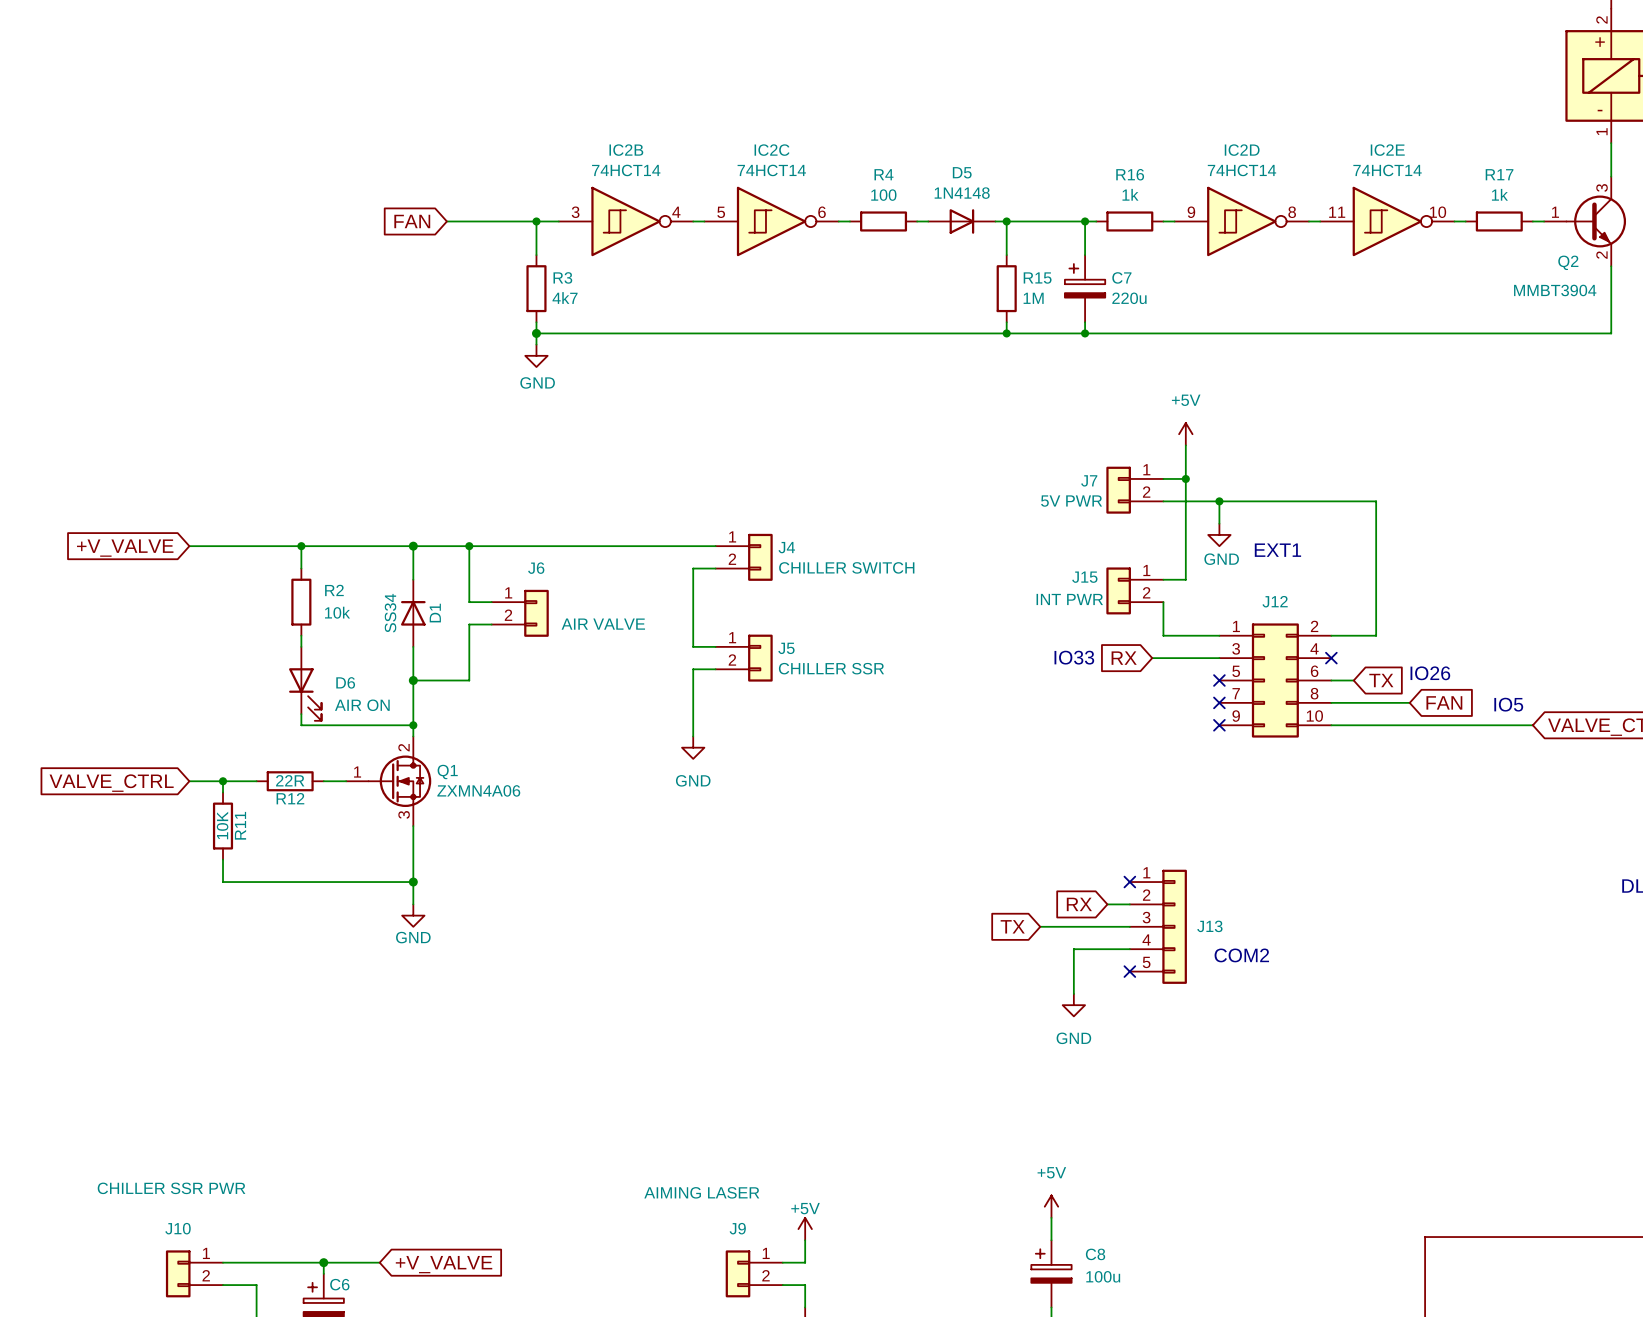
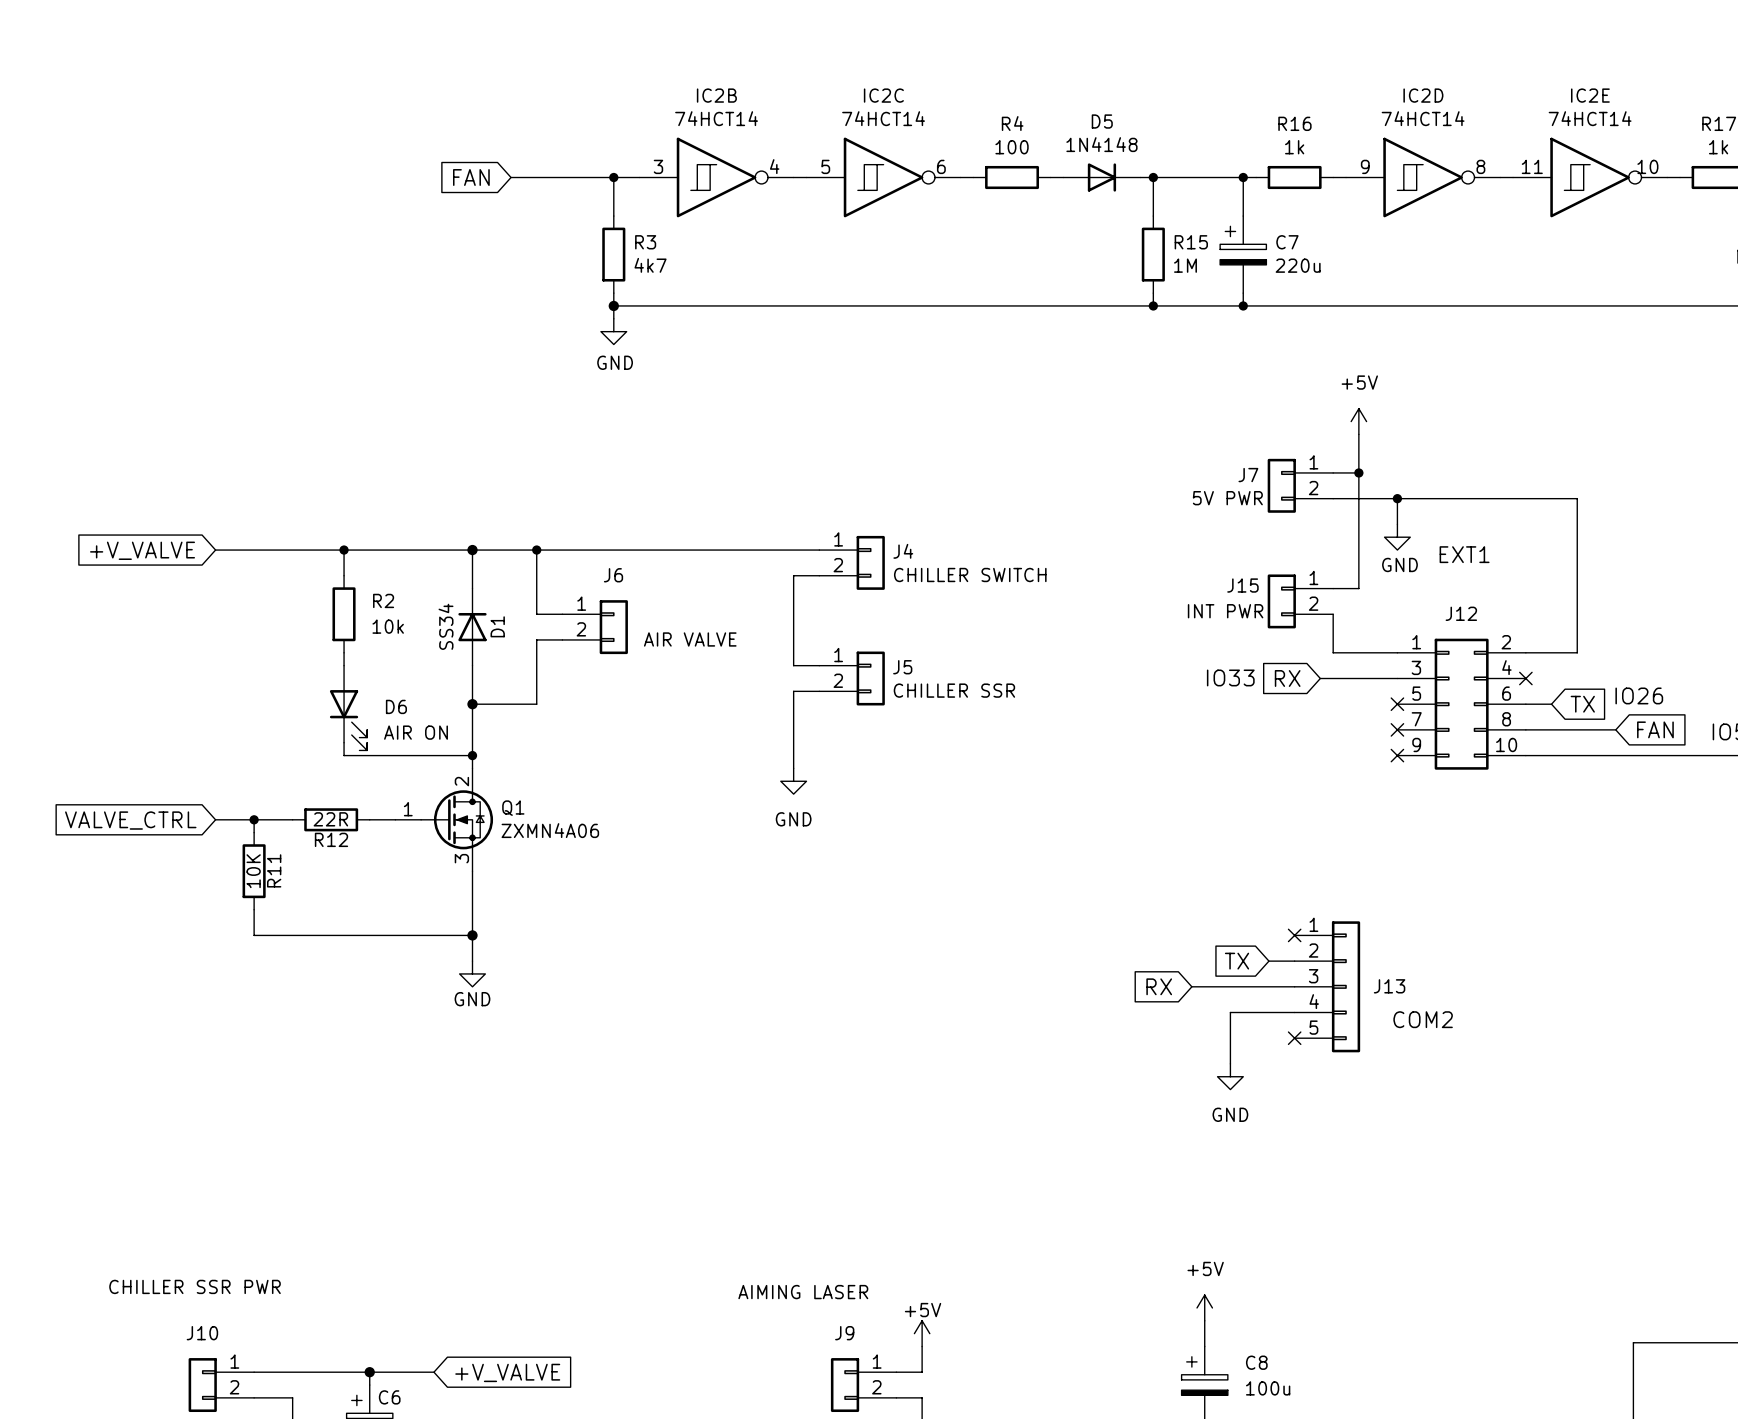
global label: RX (1079, 904) -> TX (1237, 961)
global label: TX (1012, 926) -> RX (1159, 986)

